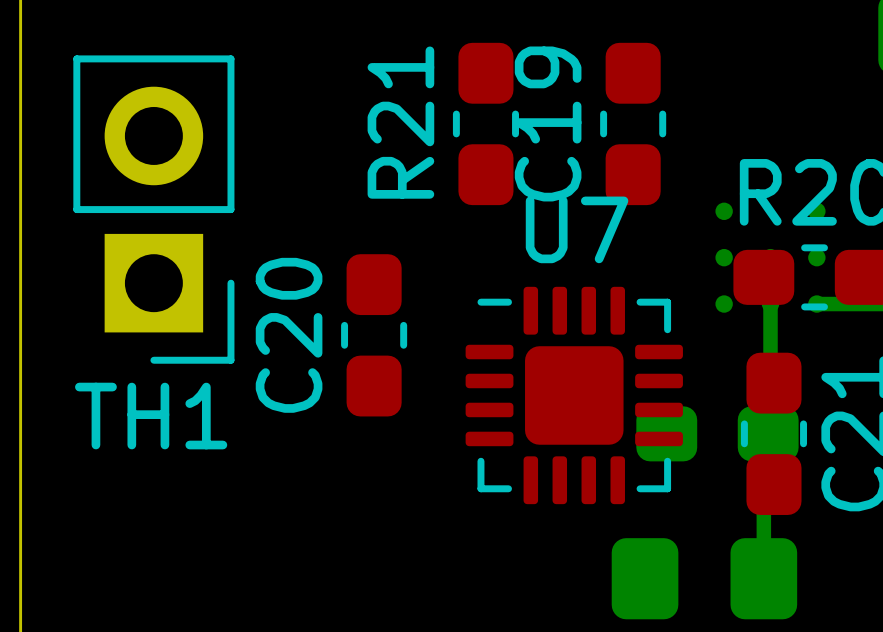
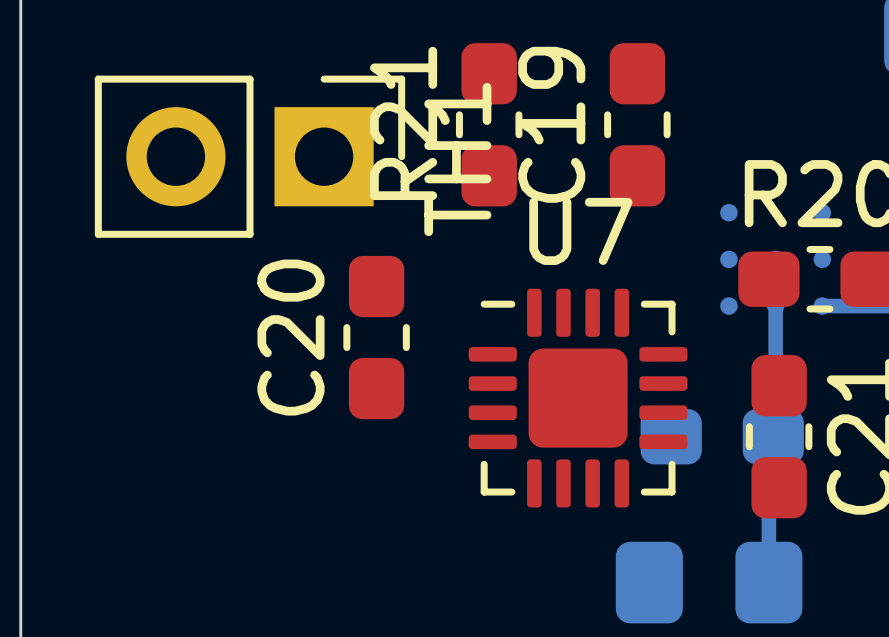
TH1 rotation: 0° (153, 209) -> 90° counterclockwise (250, 156)

